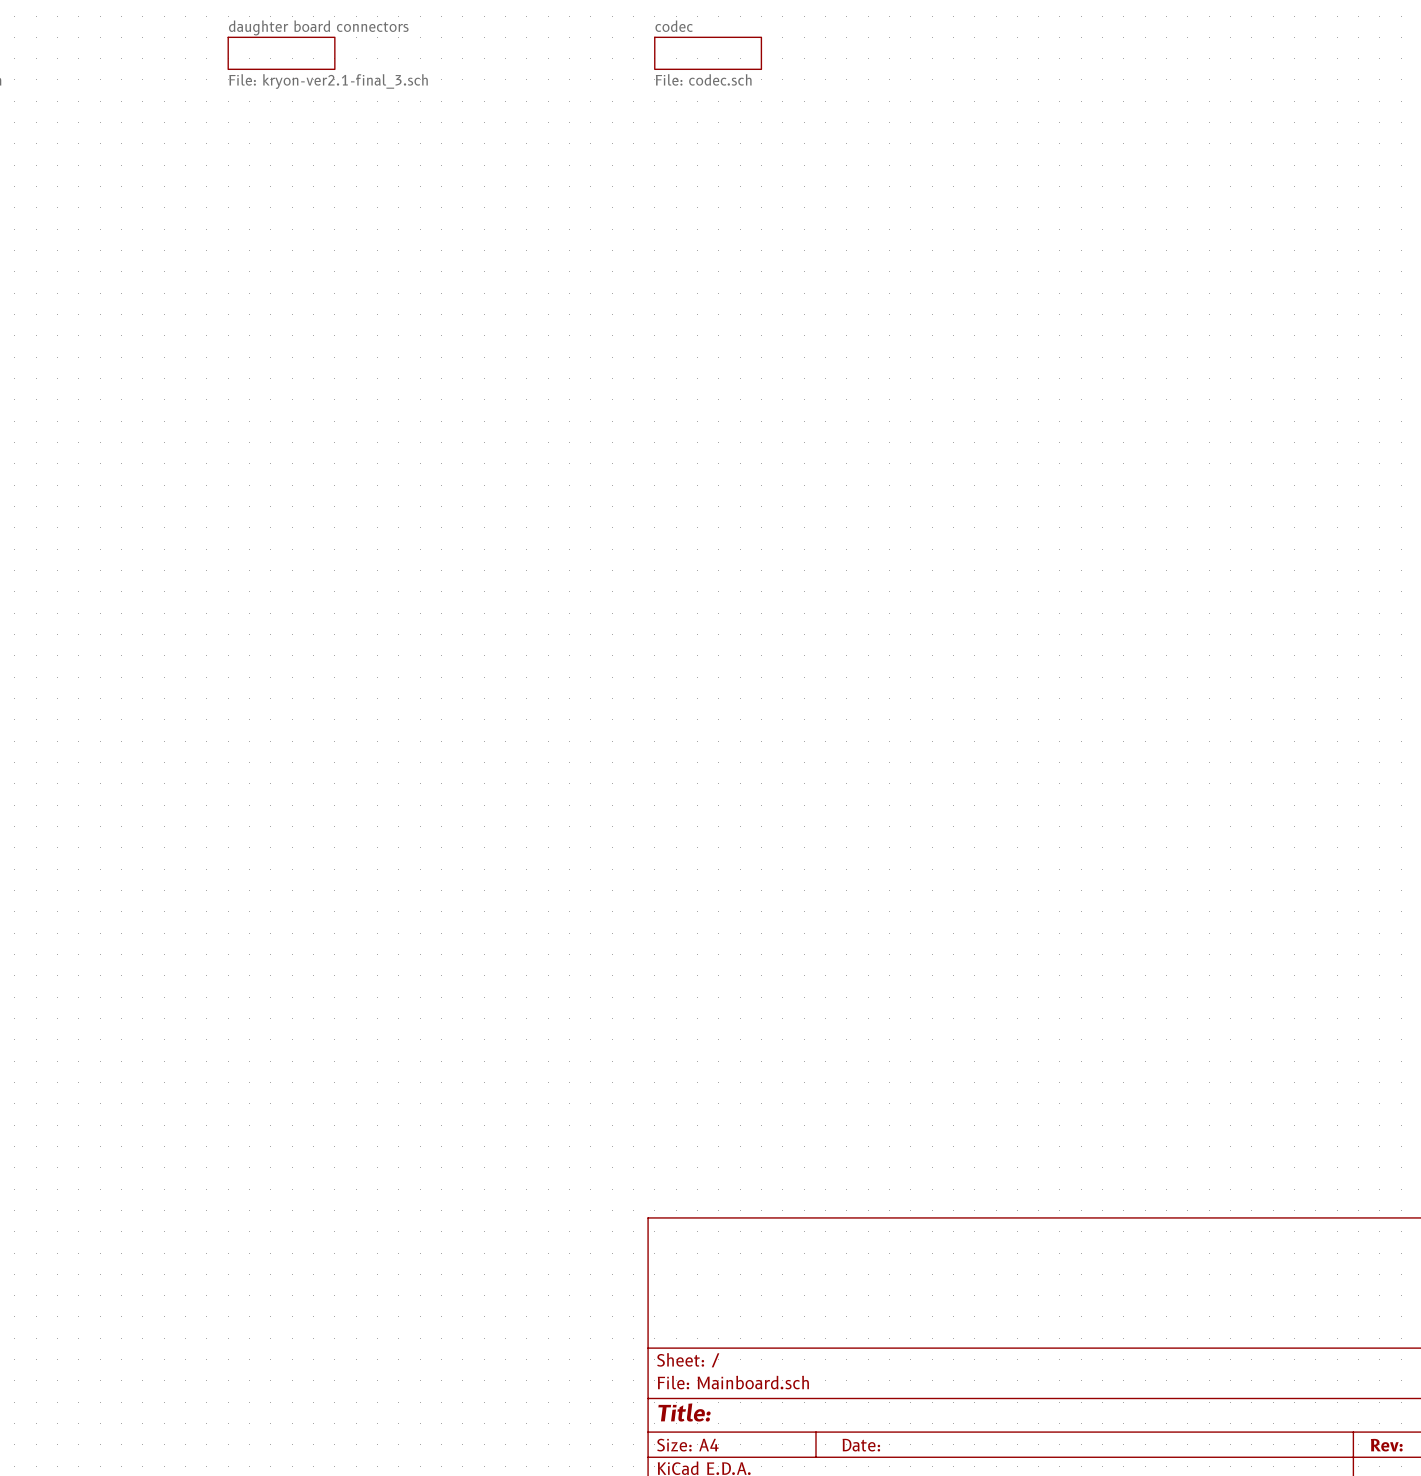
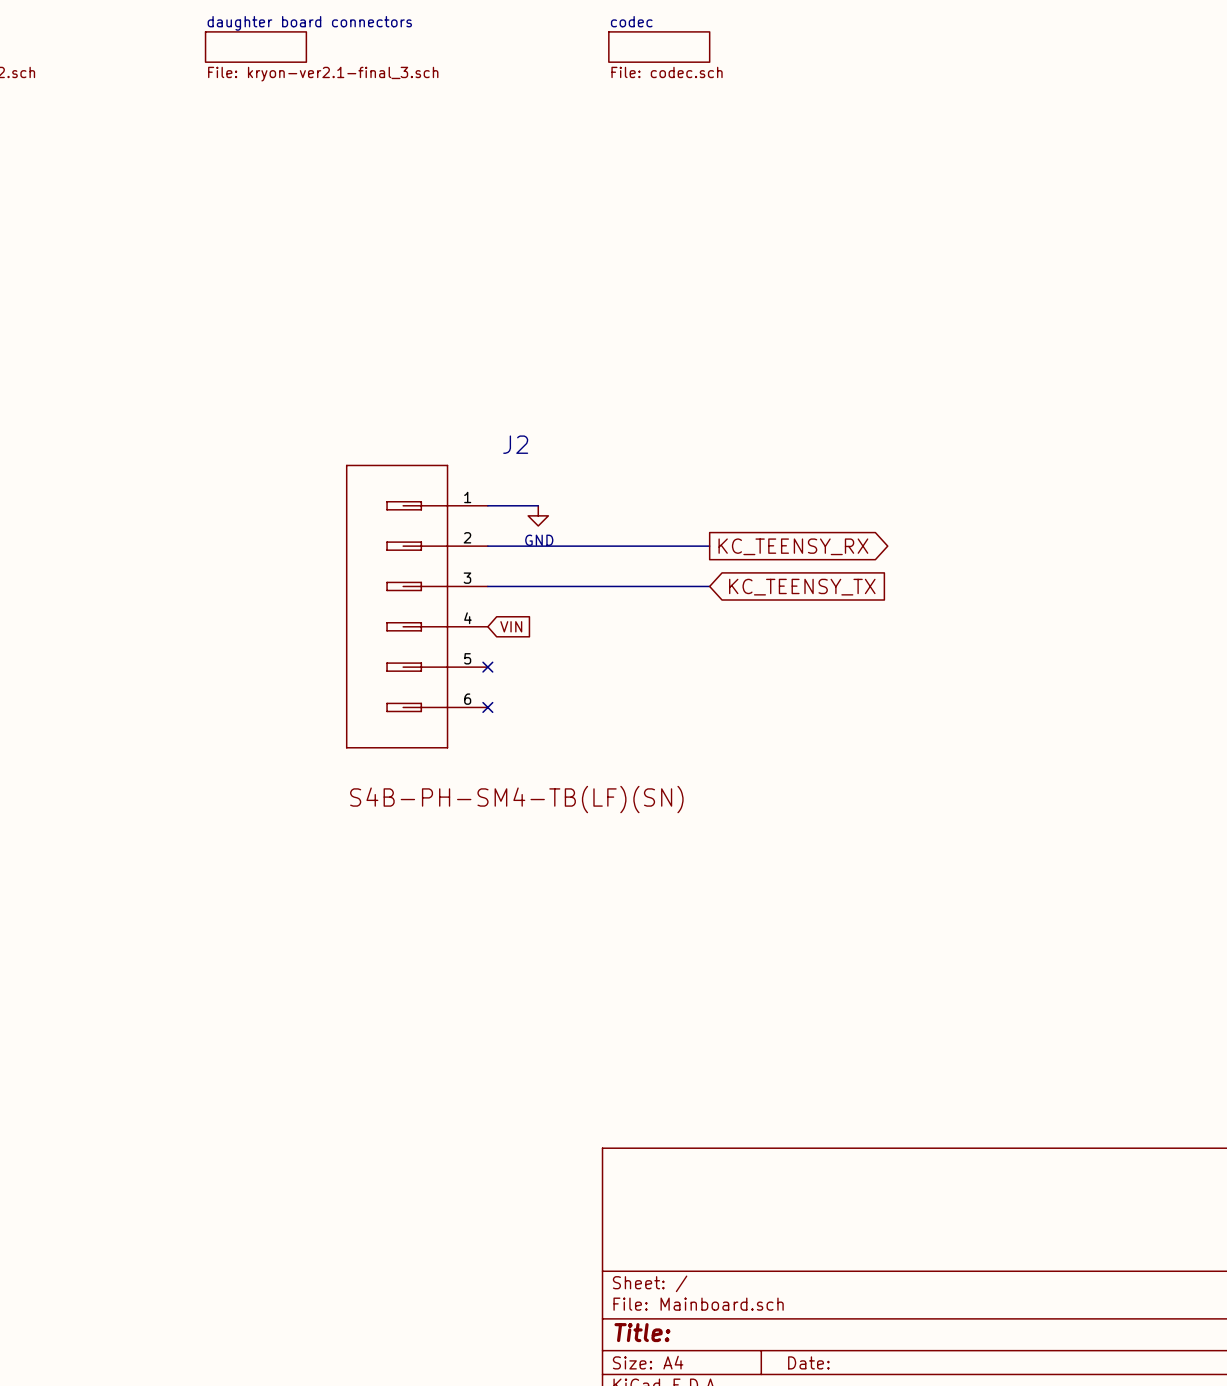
wire: none -> (487, 505) (538, 505)
power symbol: none -> GND (538, 515)
wire: none -> (487, 546) (709, 546)
global label: none -> KC_TEENSY_RX (793, 546)
wire: none -> (487, 586) (709, 586)
global label: none -> KC_TEENSY_TX (802, 587)
J2: none -> (417, 606)
global label: none -> VIN (511, 626)
no-connect mark: none -> (487, 667)
no-connect mark: none -> (487, 707)

